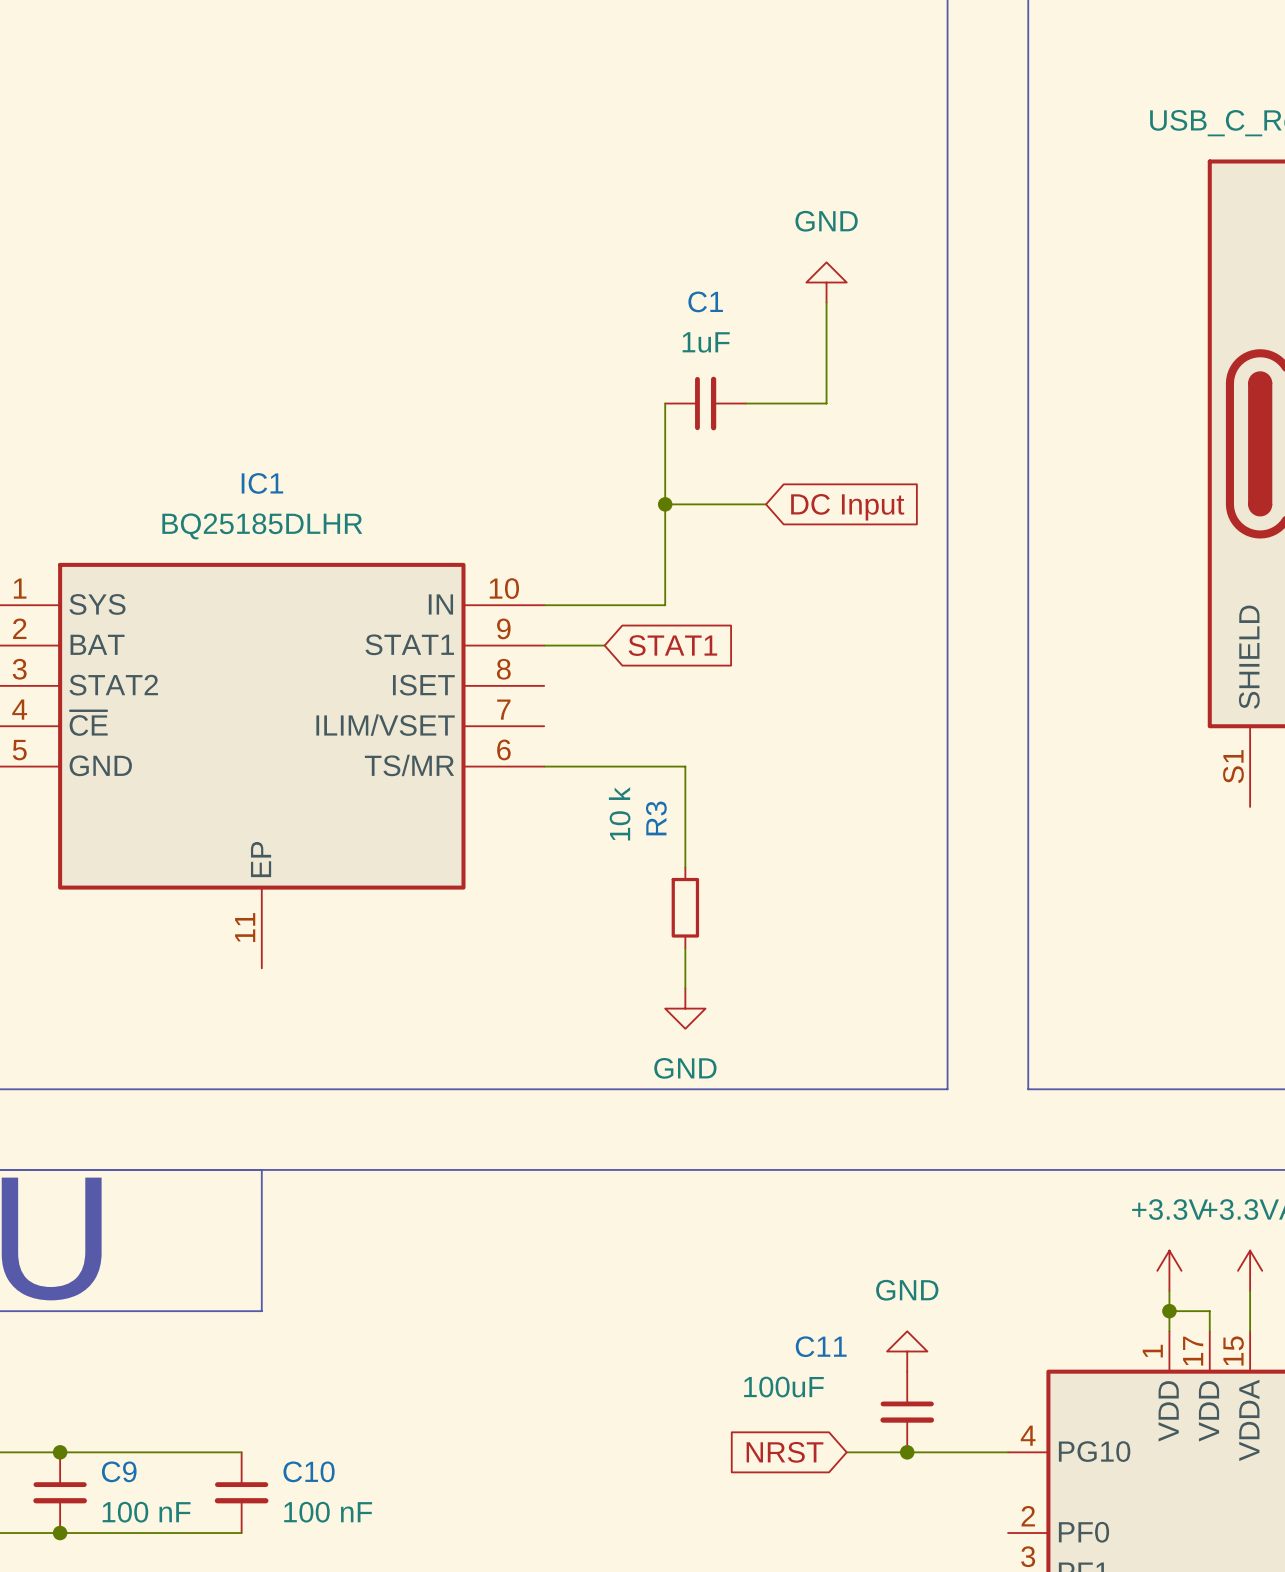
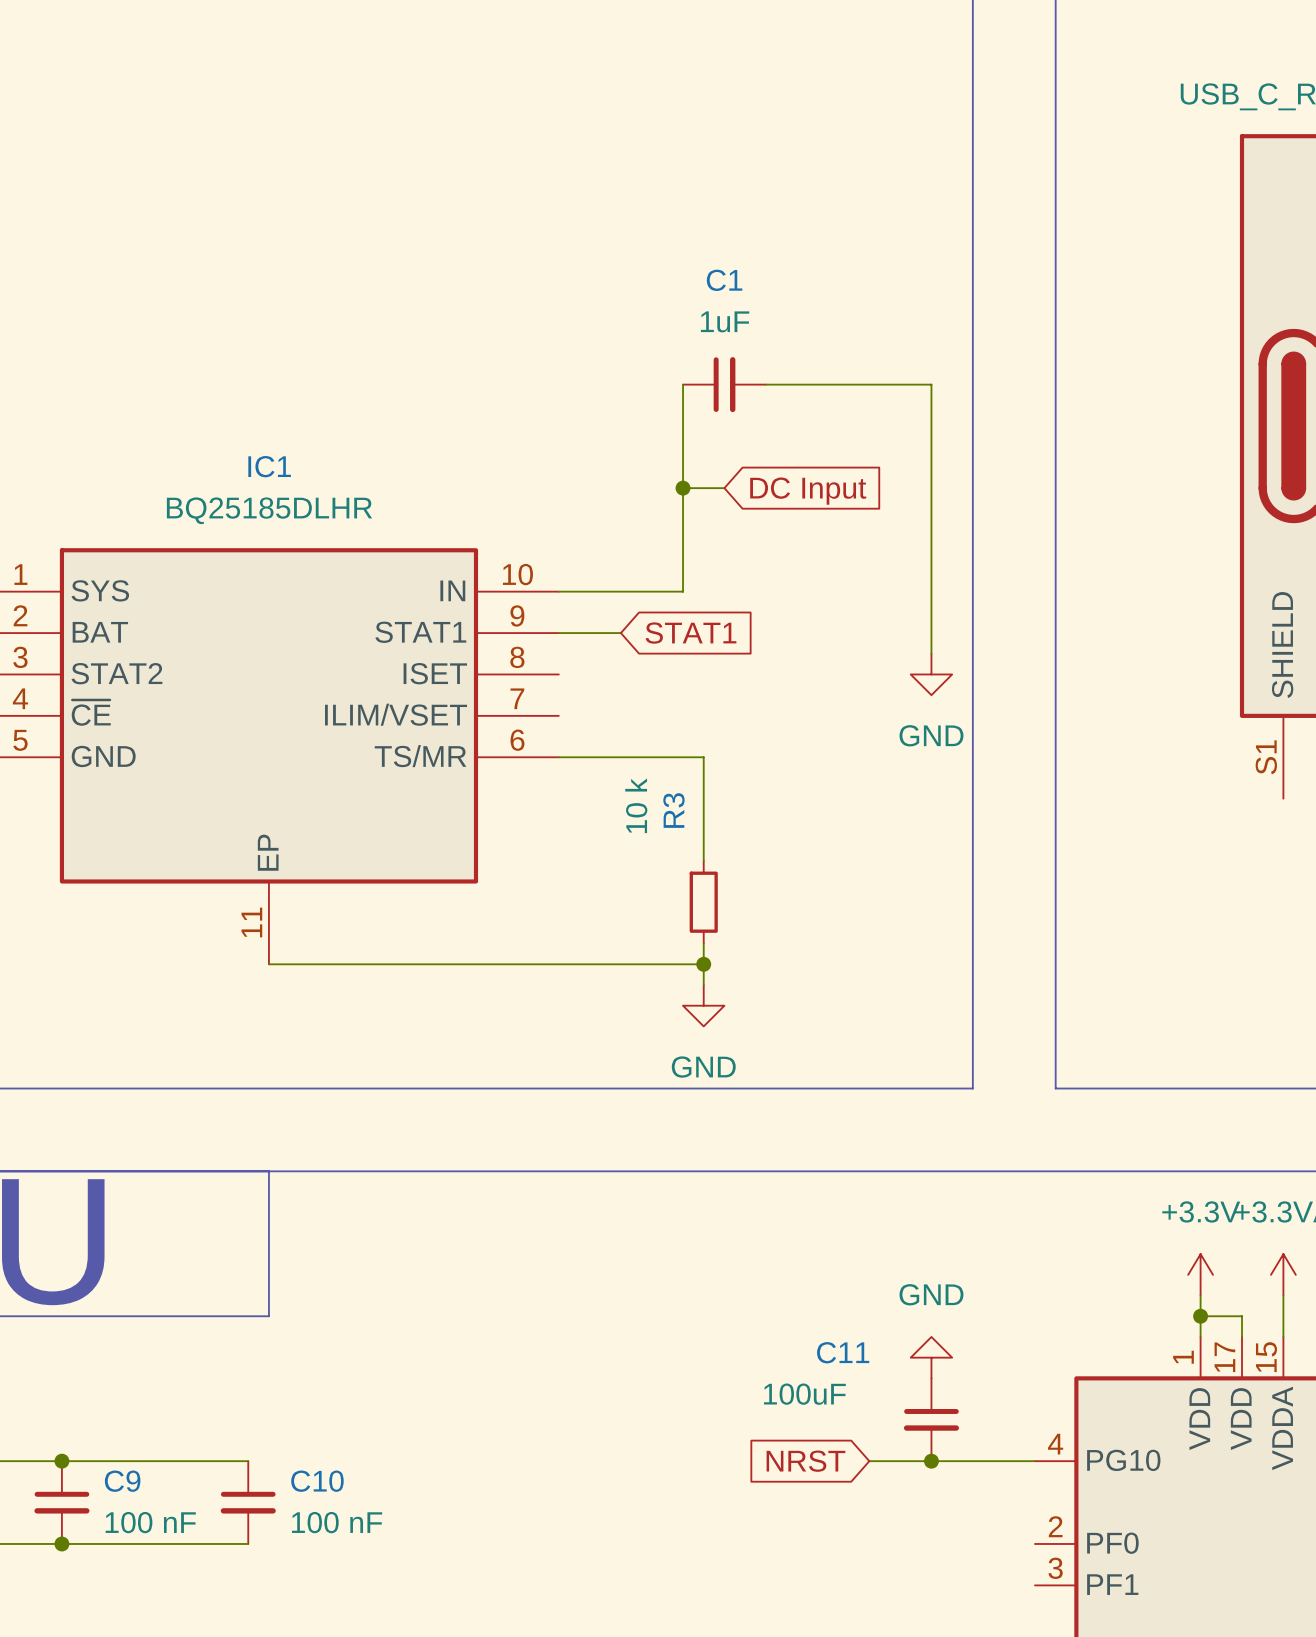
power symbol: GND (826, 282) -> none
wire: (826, 302) (826, 403) -> (931, 653) (931, 384) (848, 384)
wire: (705, 504) (766, 504) -> none
global label position: DC Input (847, 507) -> DC Input (808, 491)
power symbol: none -> GND (931, 674)
wire: none -> (268, 964) (703, 964)
junction: none -> (703, 964)

